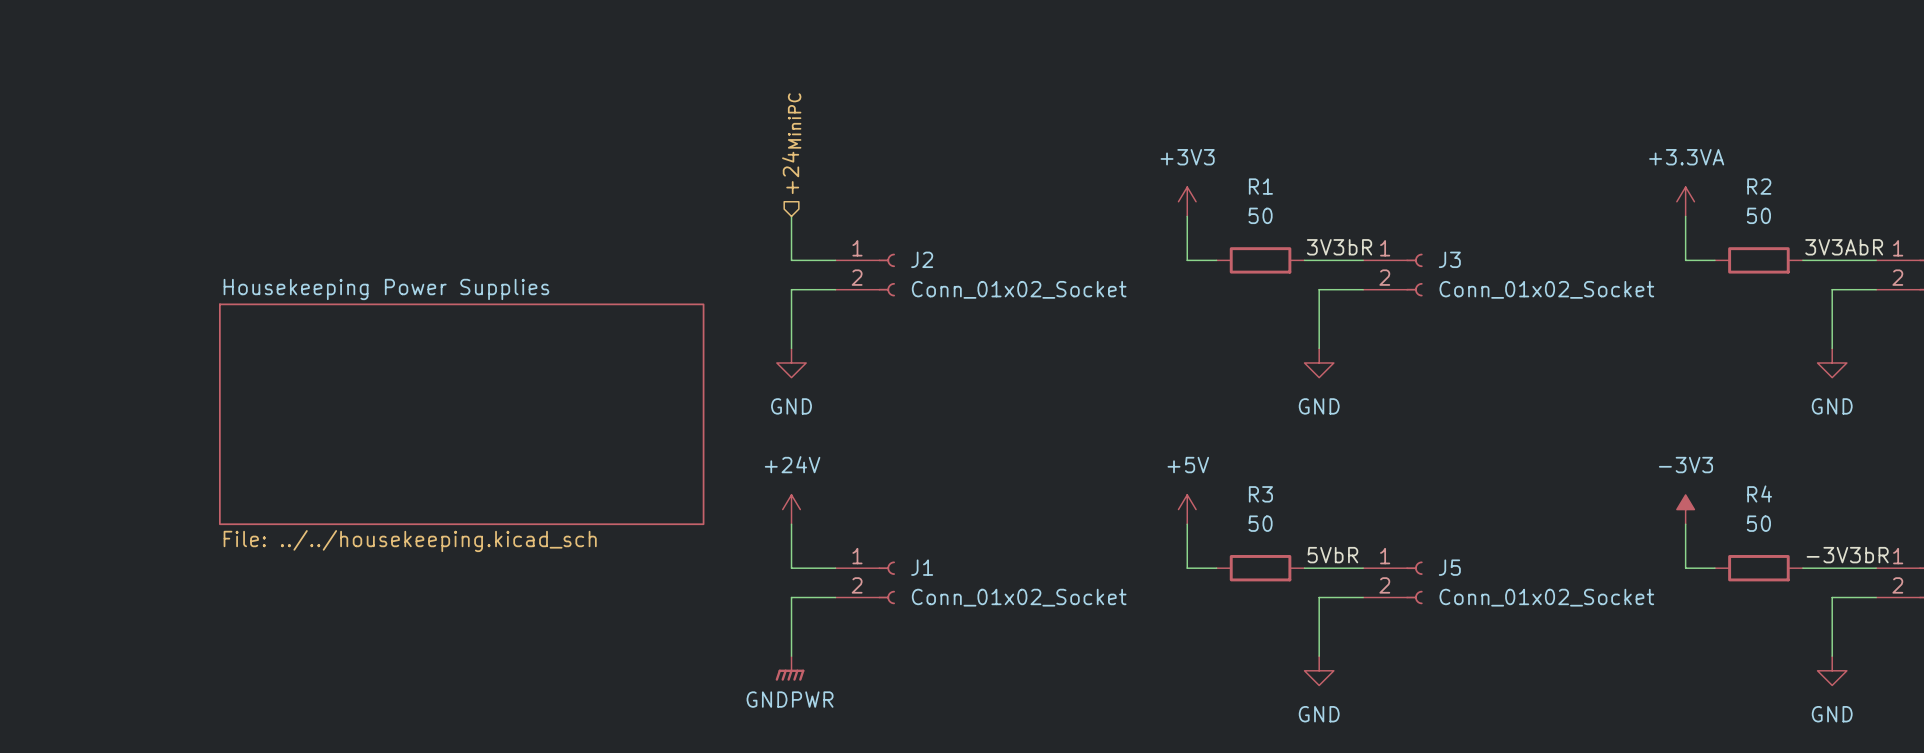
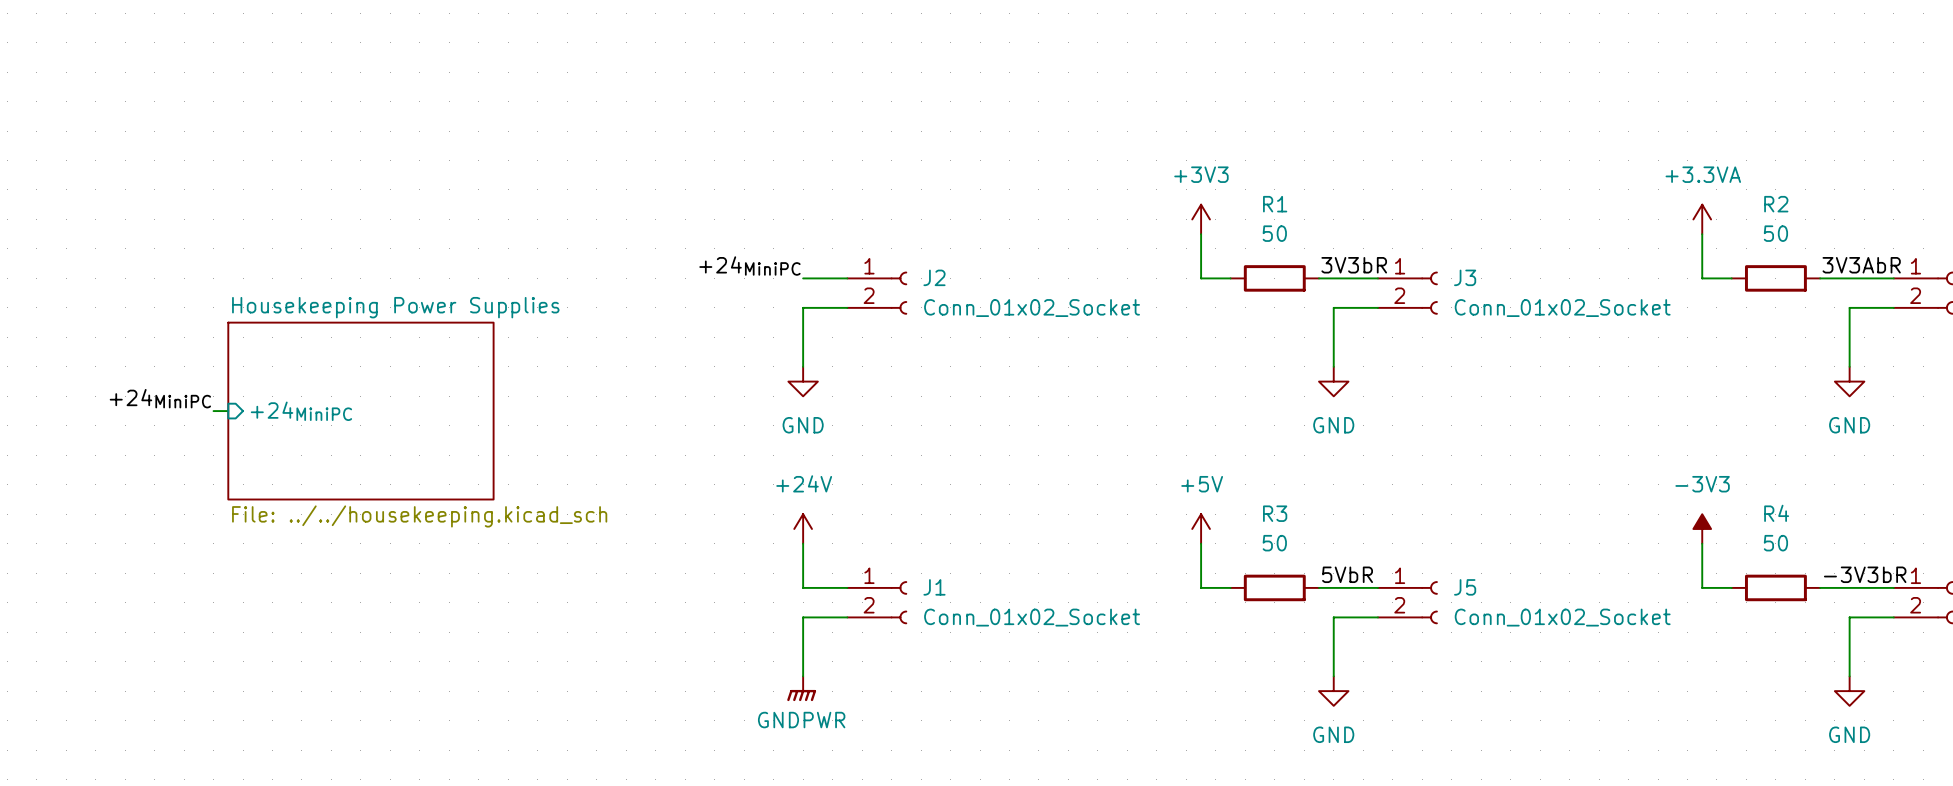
hierarchical label: +24MiniPC (791, 143) -> none
wire: (791, 216) (791, 260) -> none
label: none -> +24MiniPC (749, 266)
label: none -> +24MiniPC (160, 398)
wire: none -> (213, 411) (228, 411)
sheet pin: none -> +24MiniPC (301, 411)
sheet Housekeeping Power Supplies: none -> File: ../../housekeeping.kicad_sch (360, 411)
sheet Housekeeping Power Supplies: File: ../../housekeeping.kicad_sch (461, 414) -> none

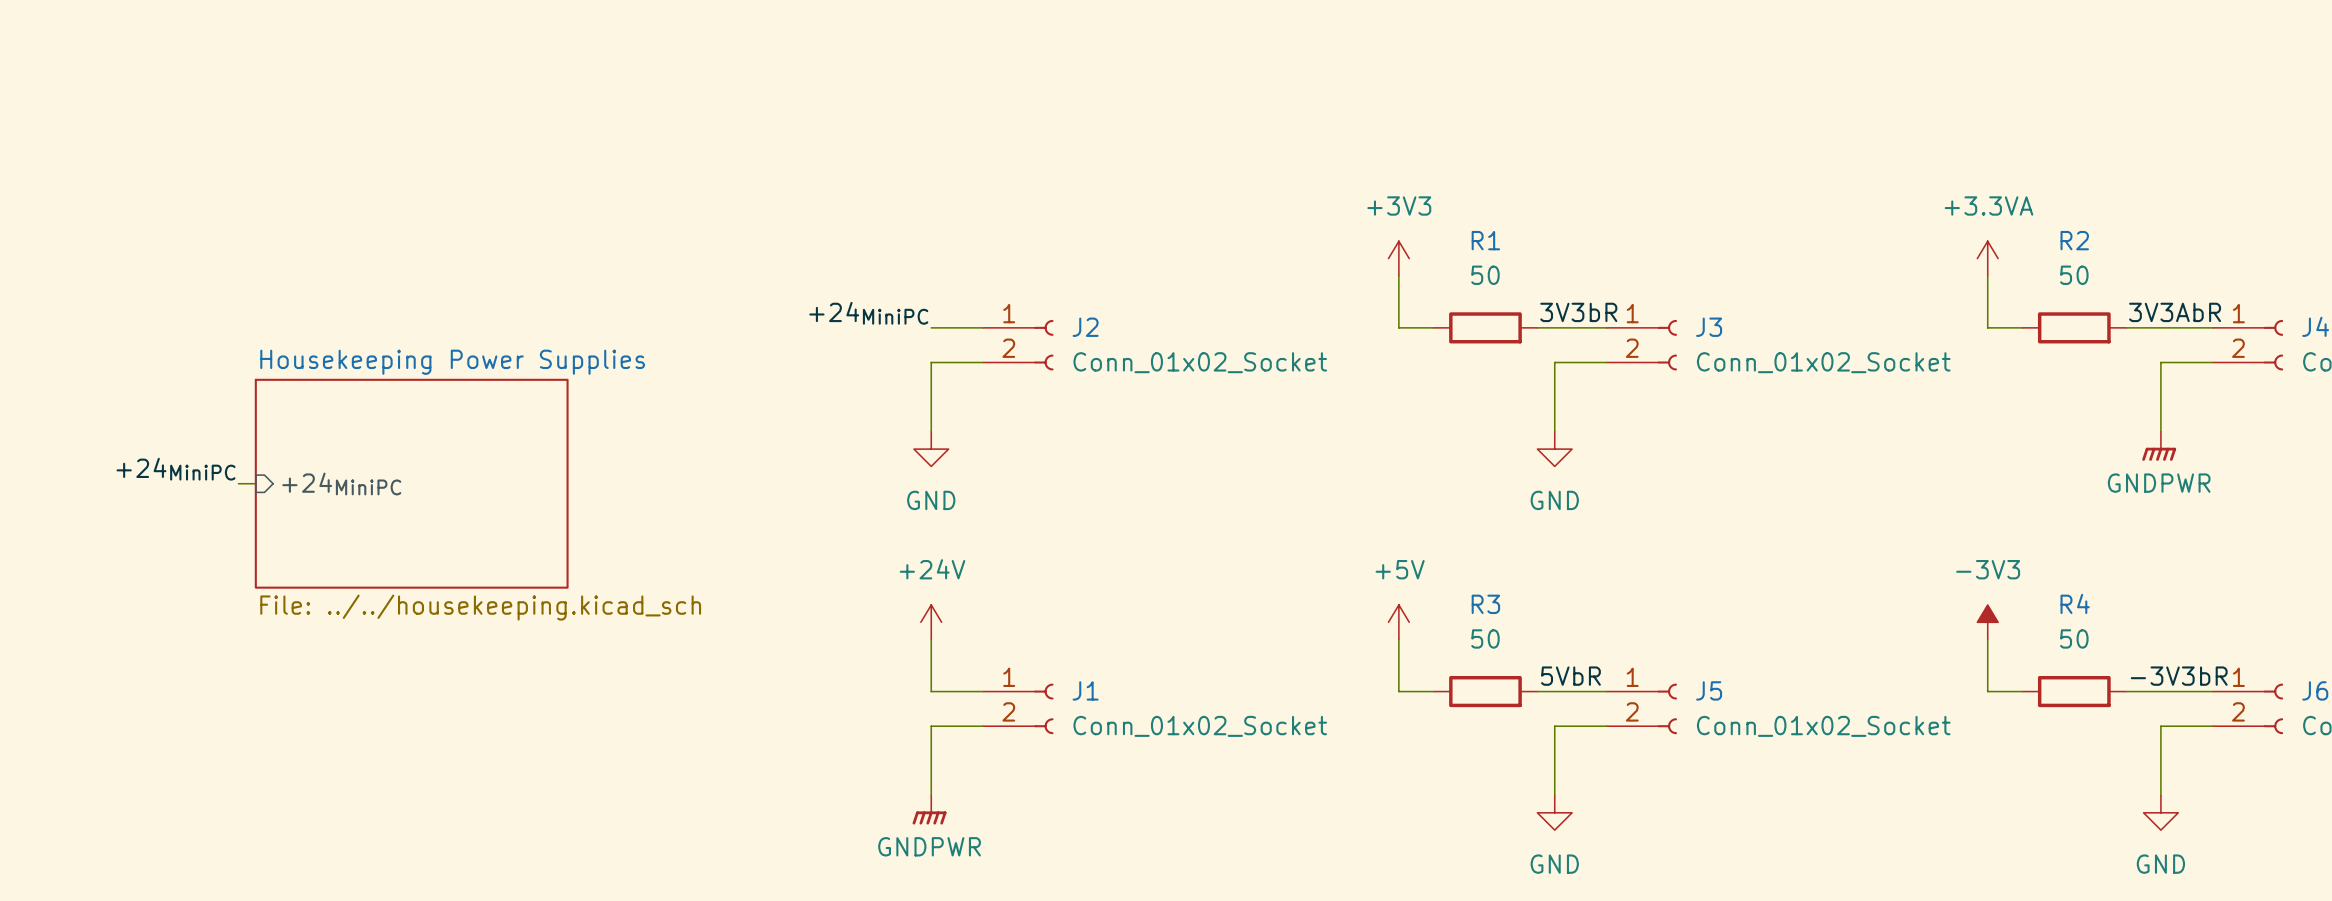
power symbol: GND (1849, 381) -> GNDPWR (2159, 446)

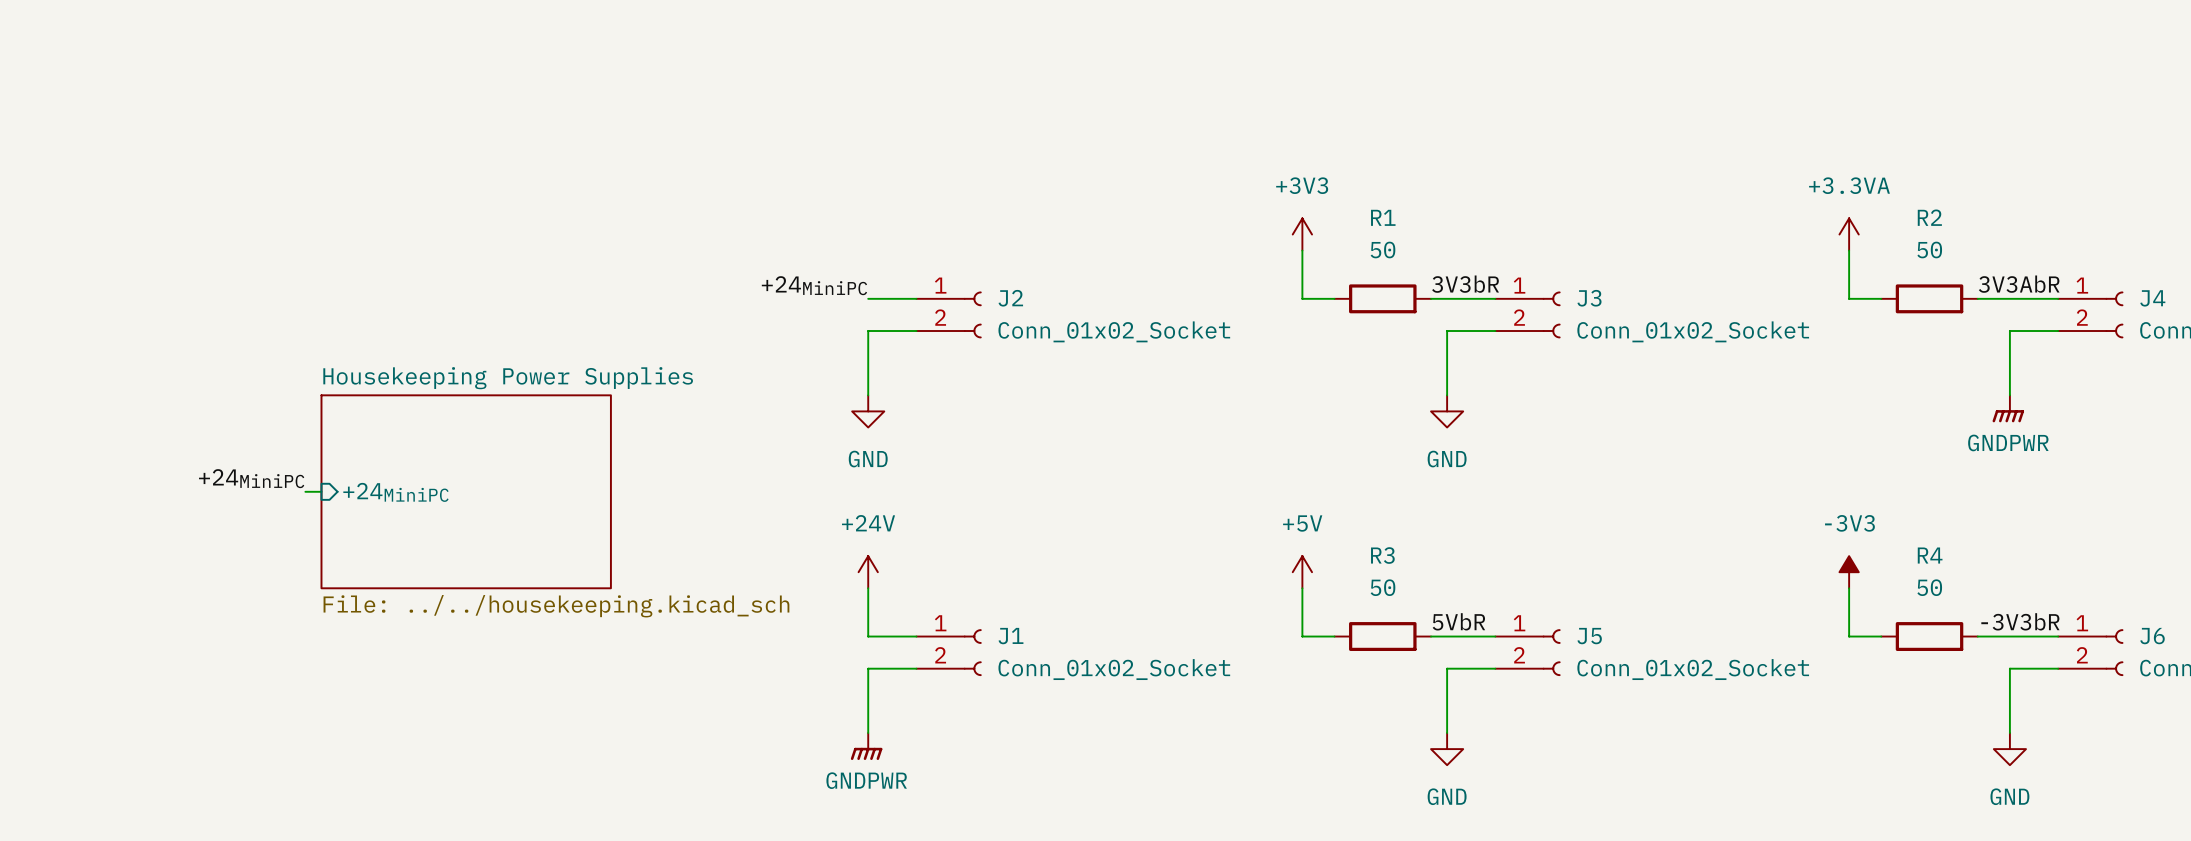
label position: +24MiniPC (176, 469) -> +24MiniPC (251, 478)
wire: (238, 483) (255, 483) -> (305, 491) (321, 491)
sheet pin position: +24MiniPC (341, 483) -> +24MiniPC (395, 492)
sheet Housekeeping Power Supplies position: (411, 483) -> (466, 491)

